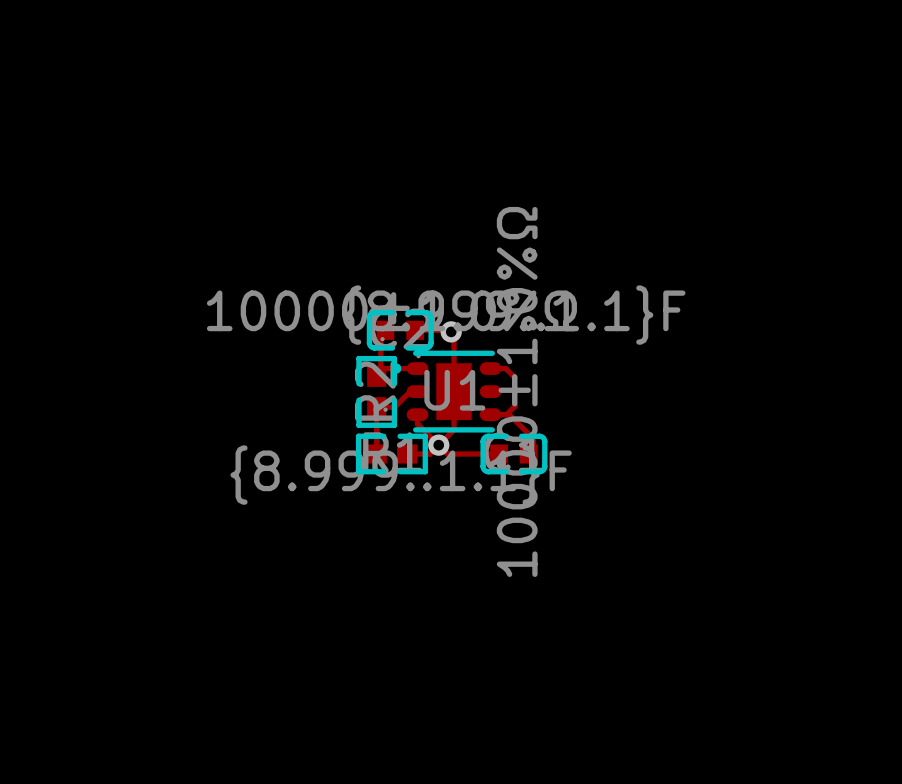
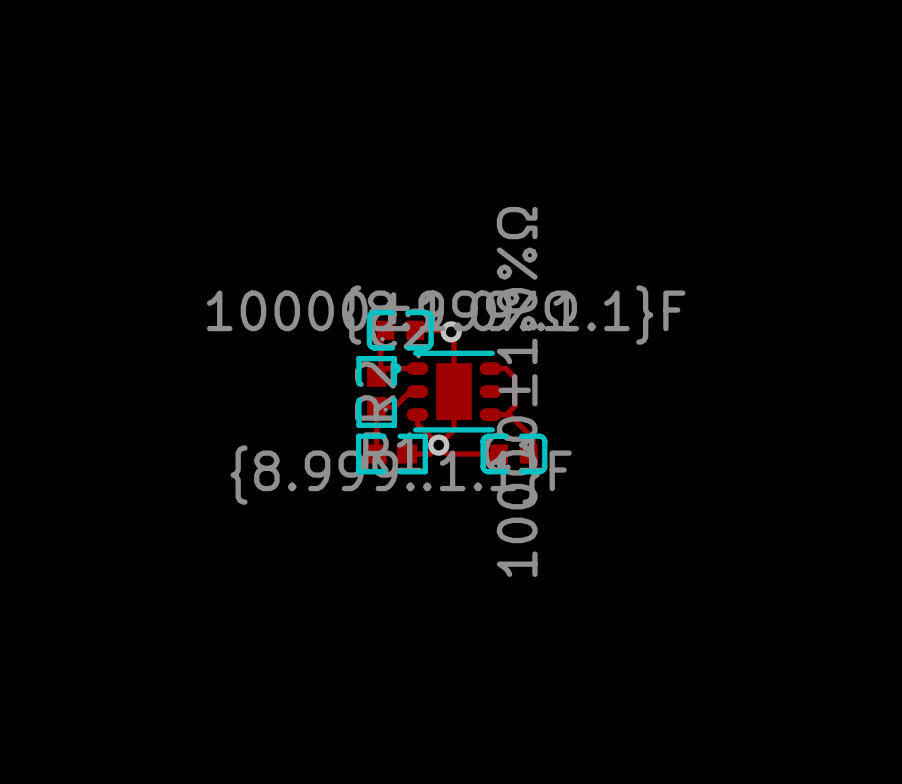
U1 name: U1 (454, 390) -> none

